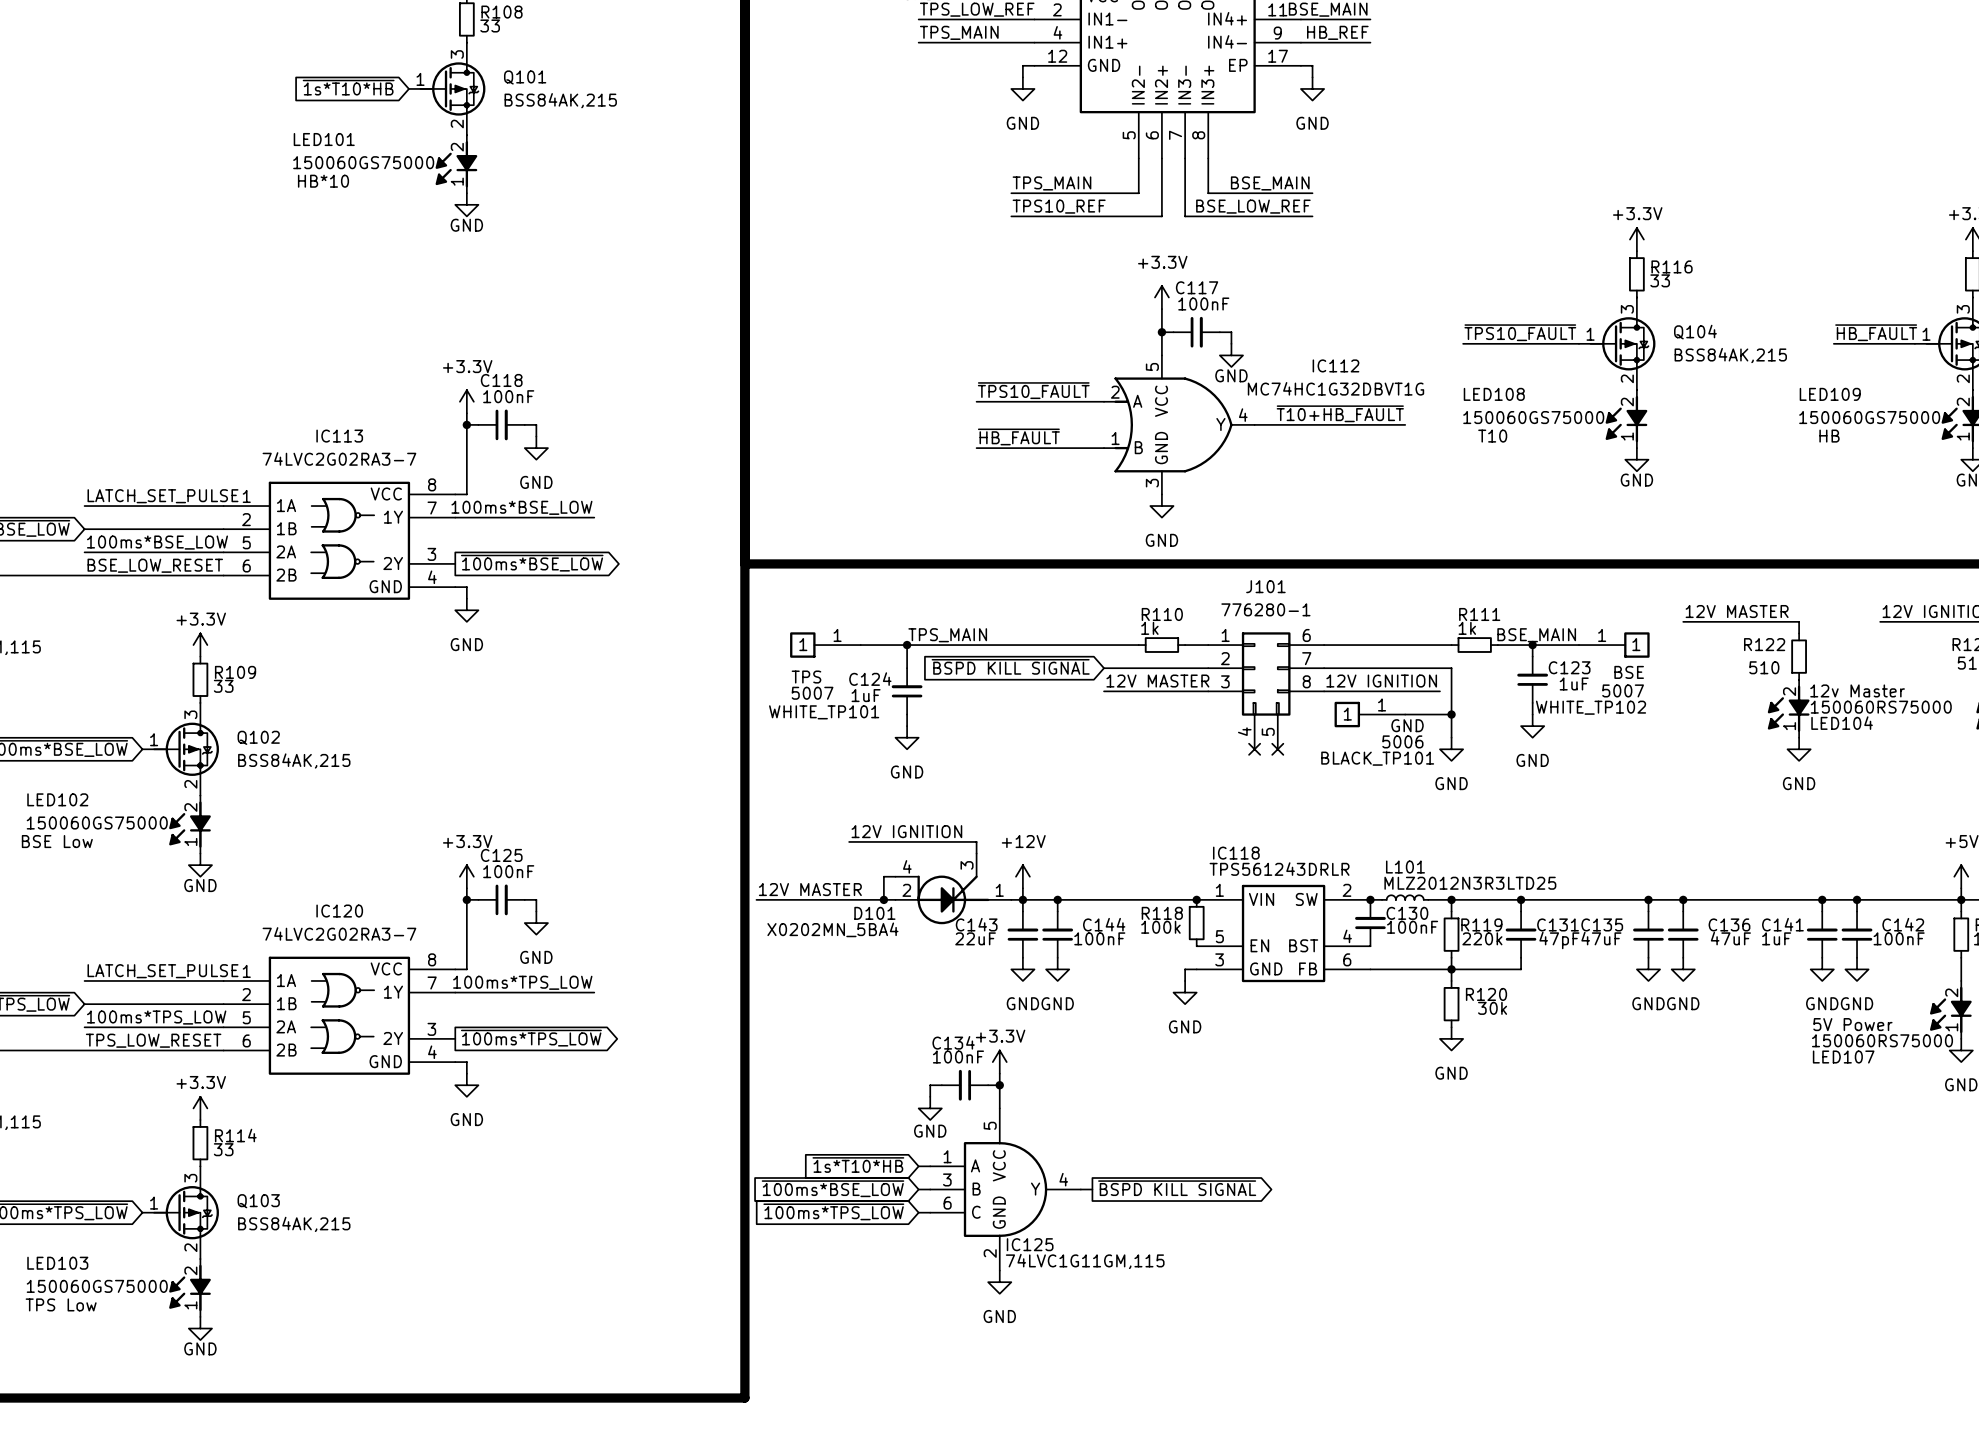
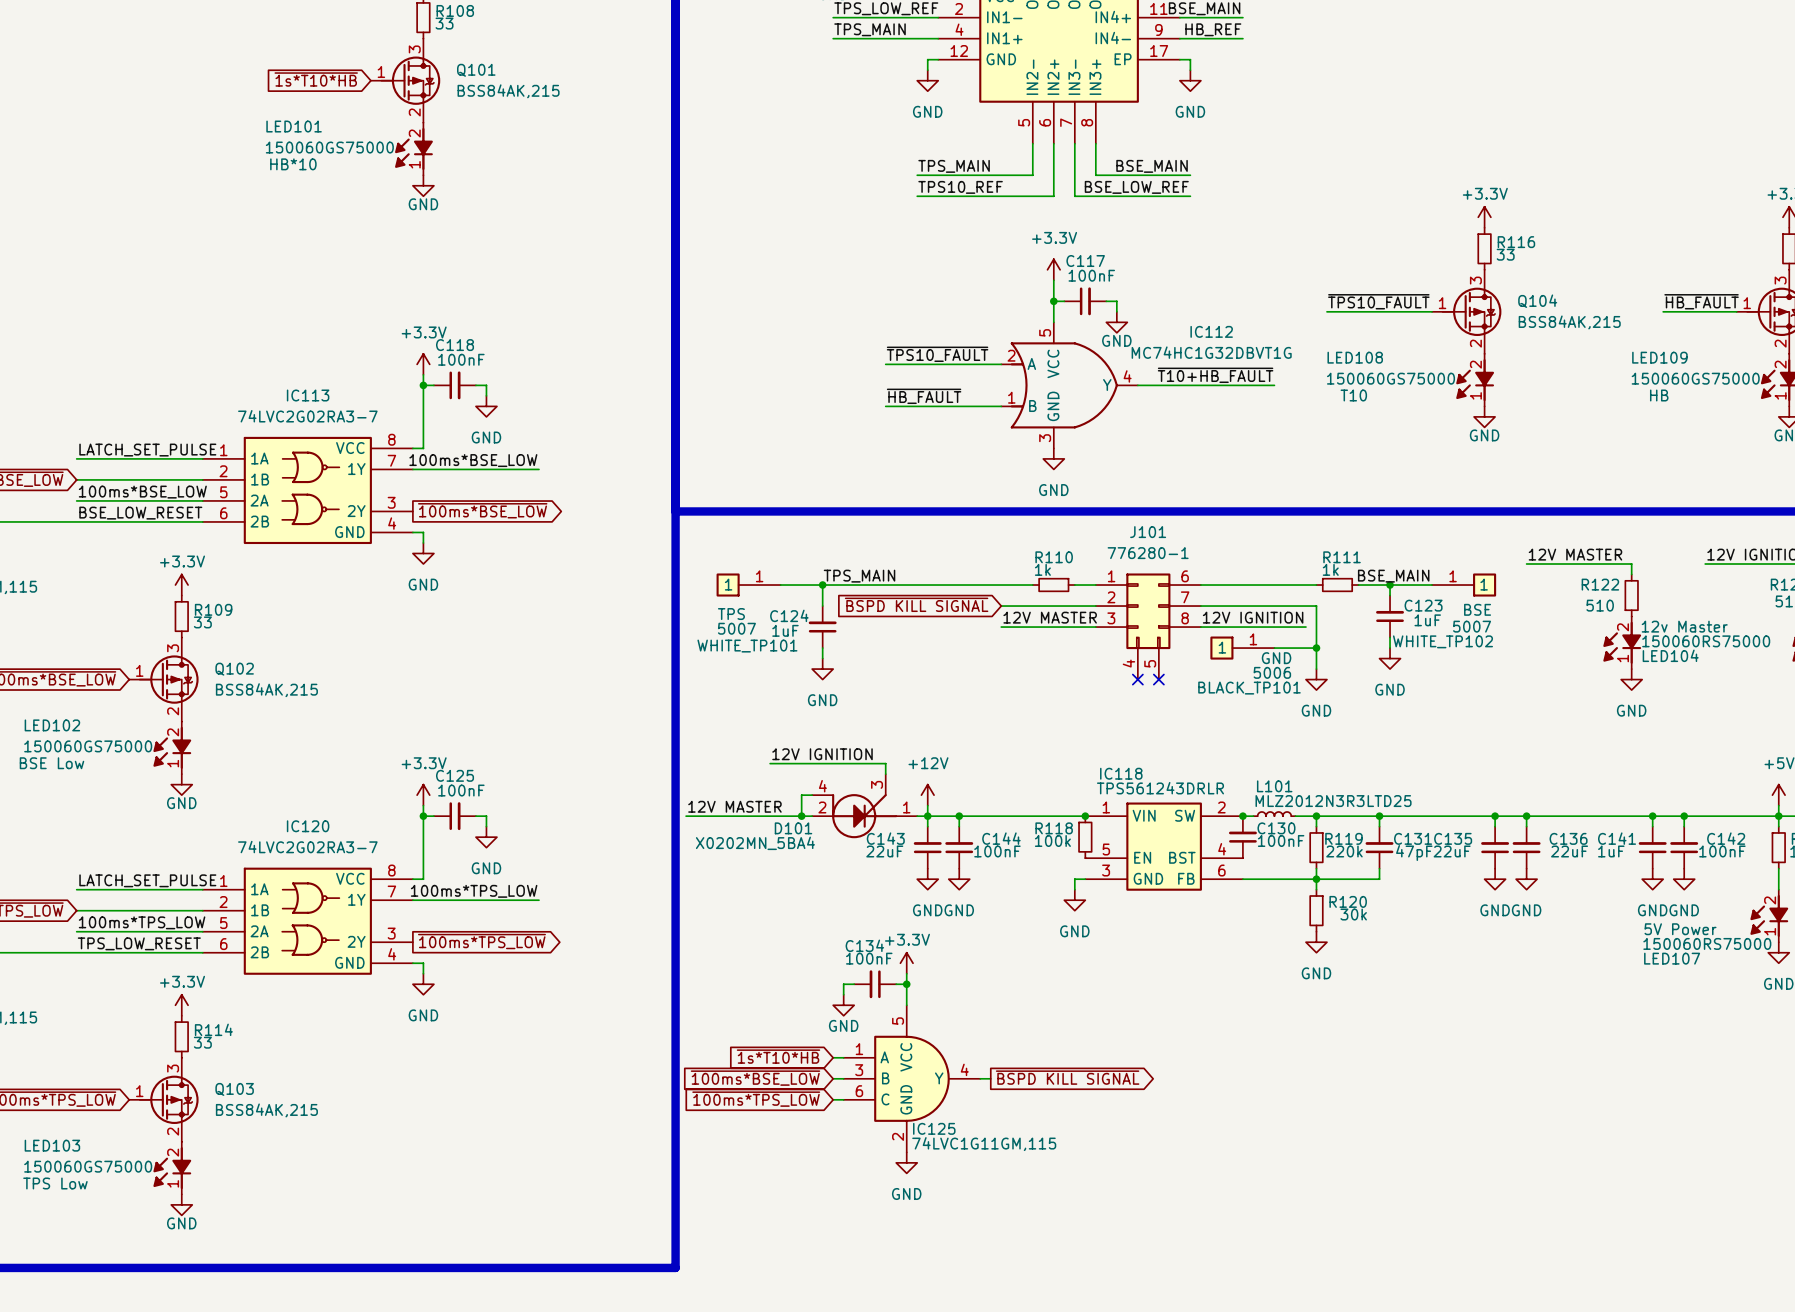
C135 value: 47uF (1601, 938) -> 22uF (1452, 851)
C136 value: 47uF (1730, 938) -> 22uF (1569, 851)

